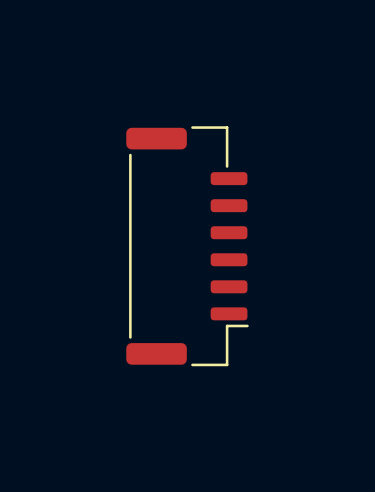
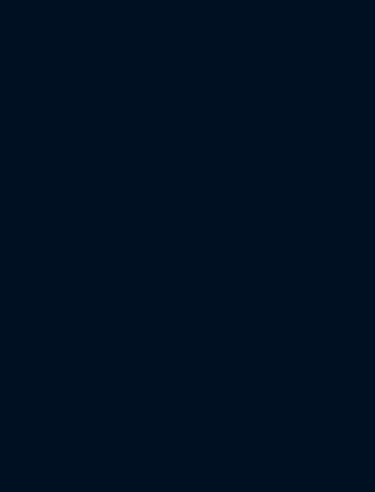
part: (187, 246) -> none

